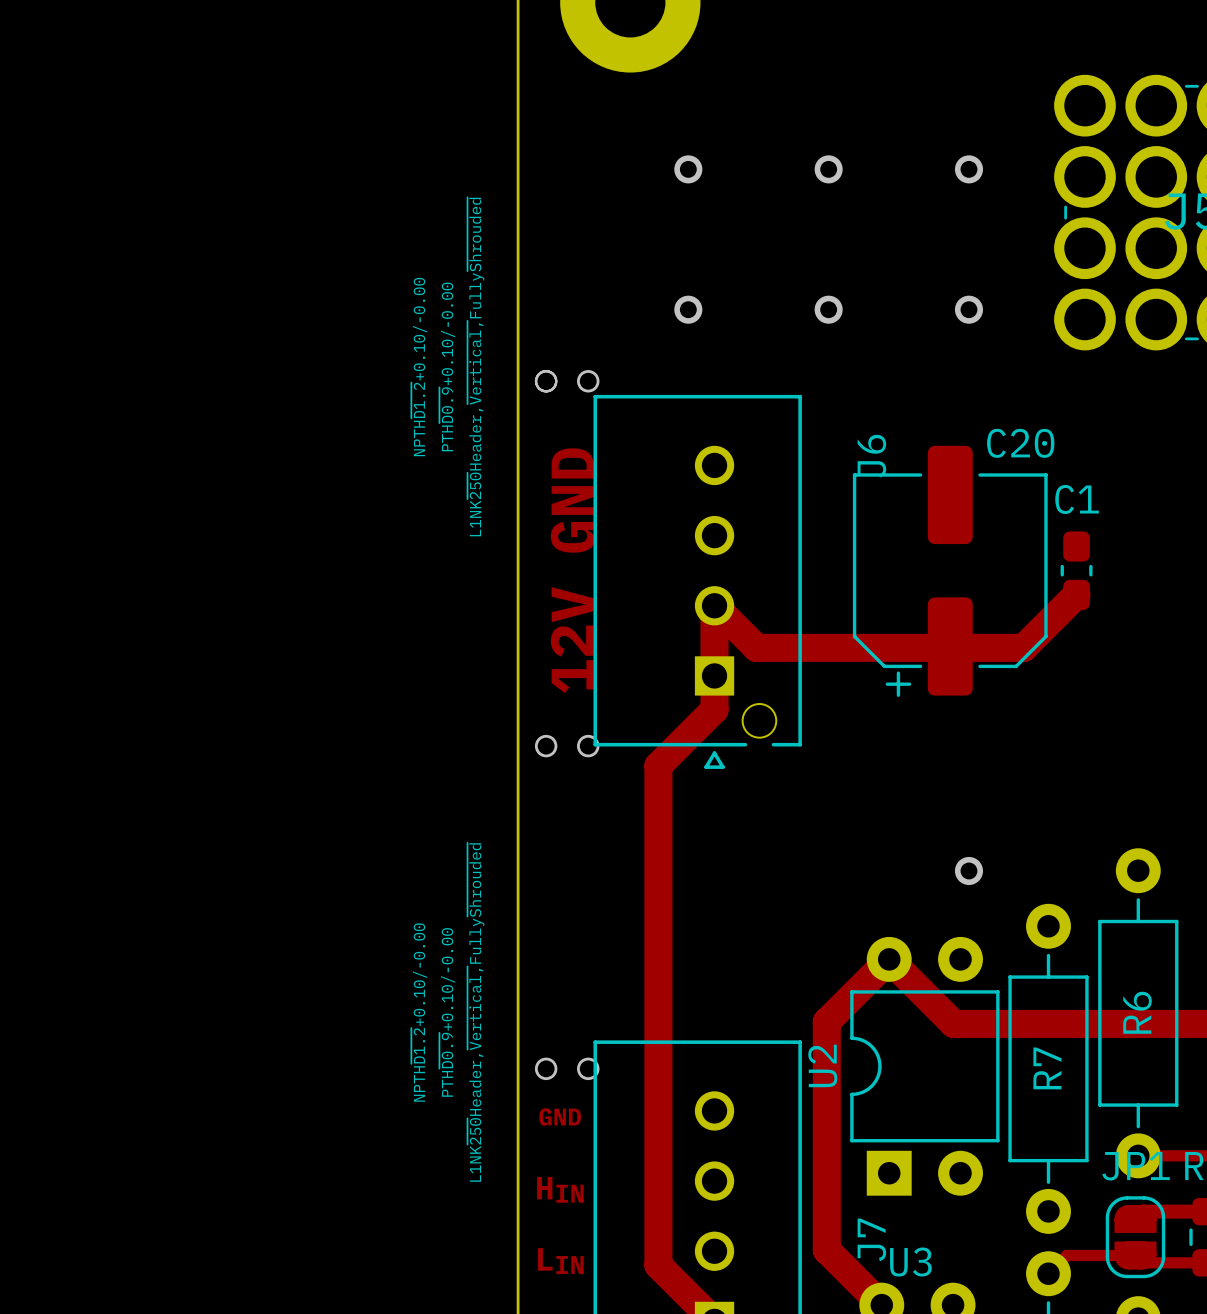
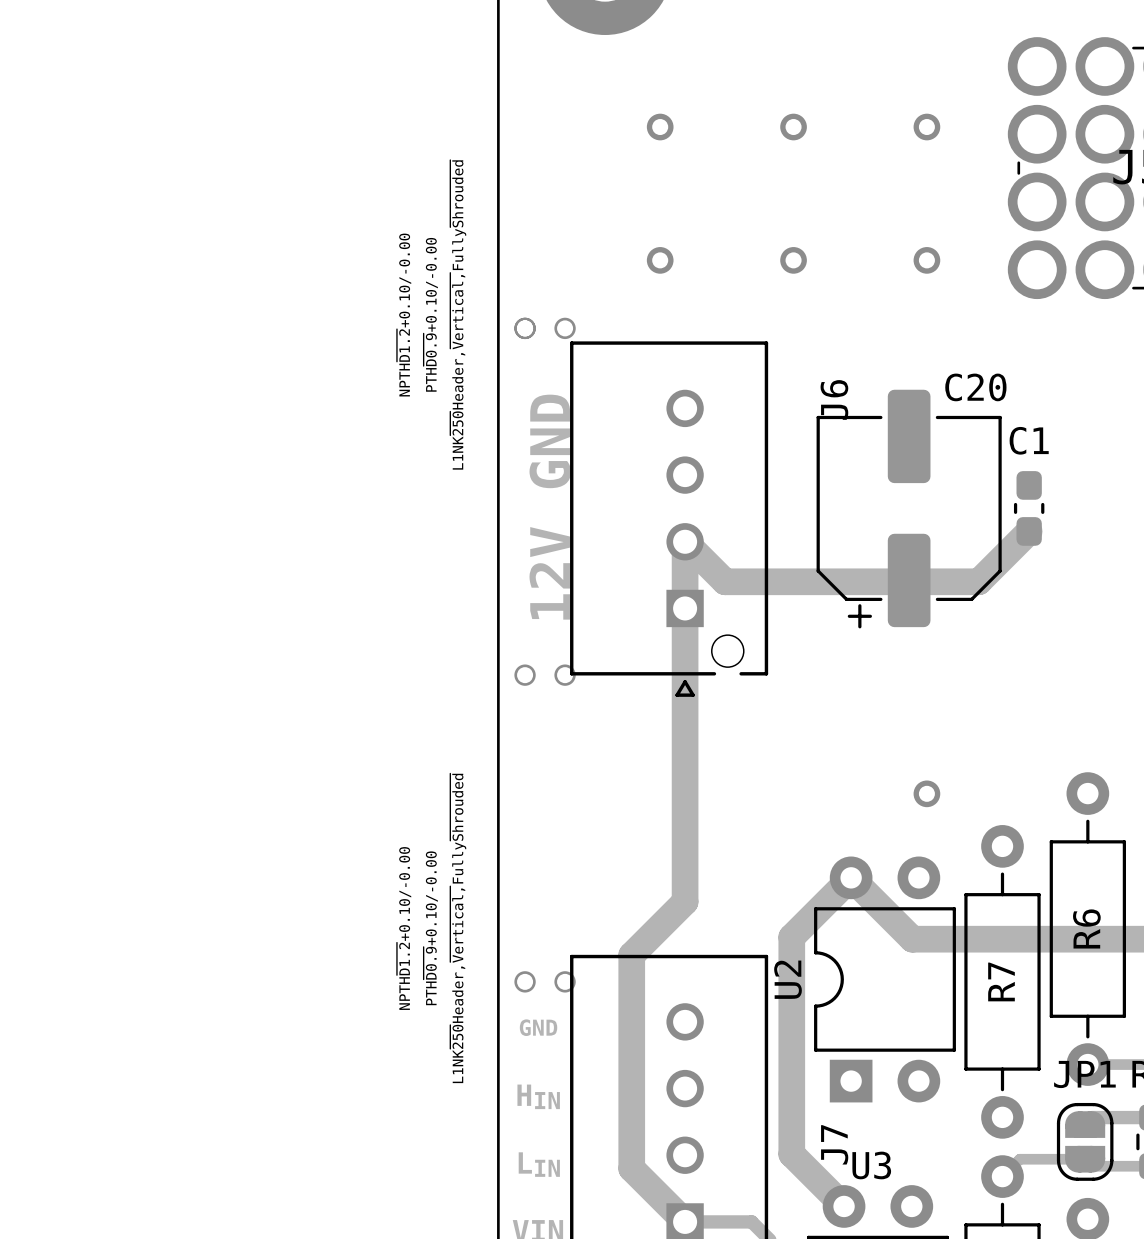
track: (714, 709) (658, 765) (658, 1040) -> (685, 640) (685, 901) (631, 955)

